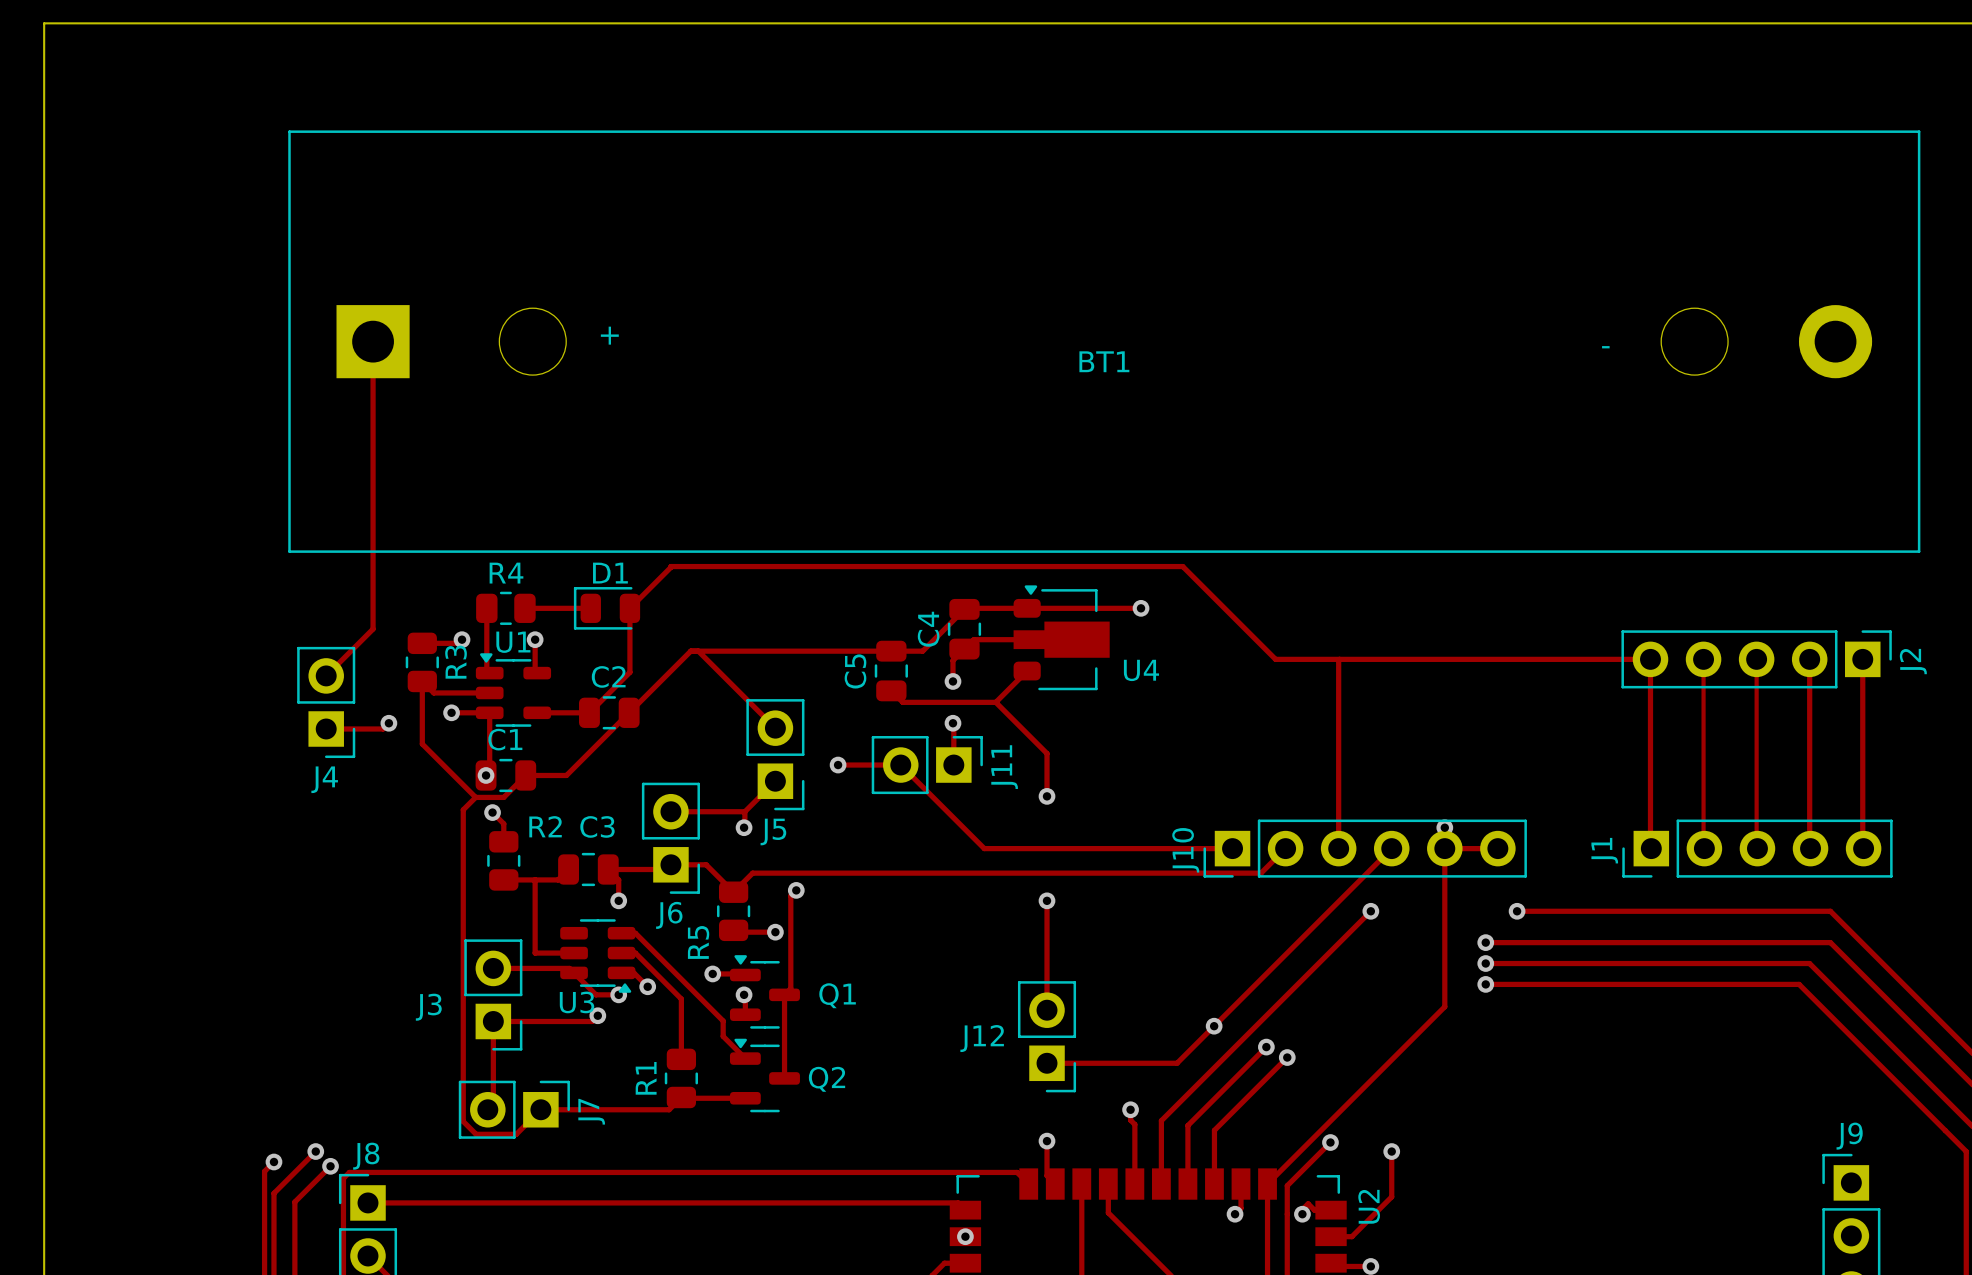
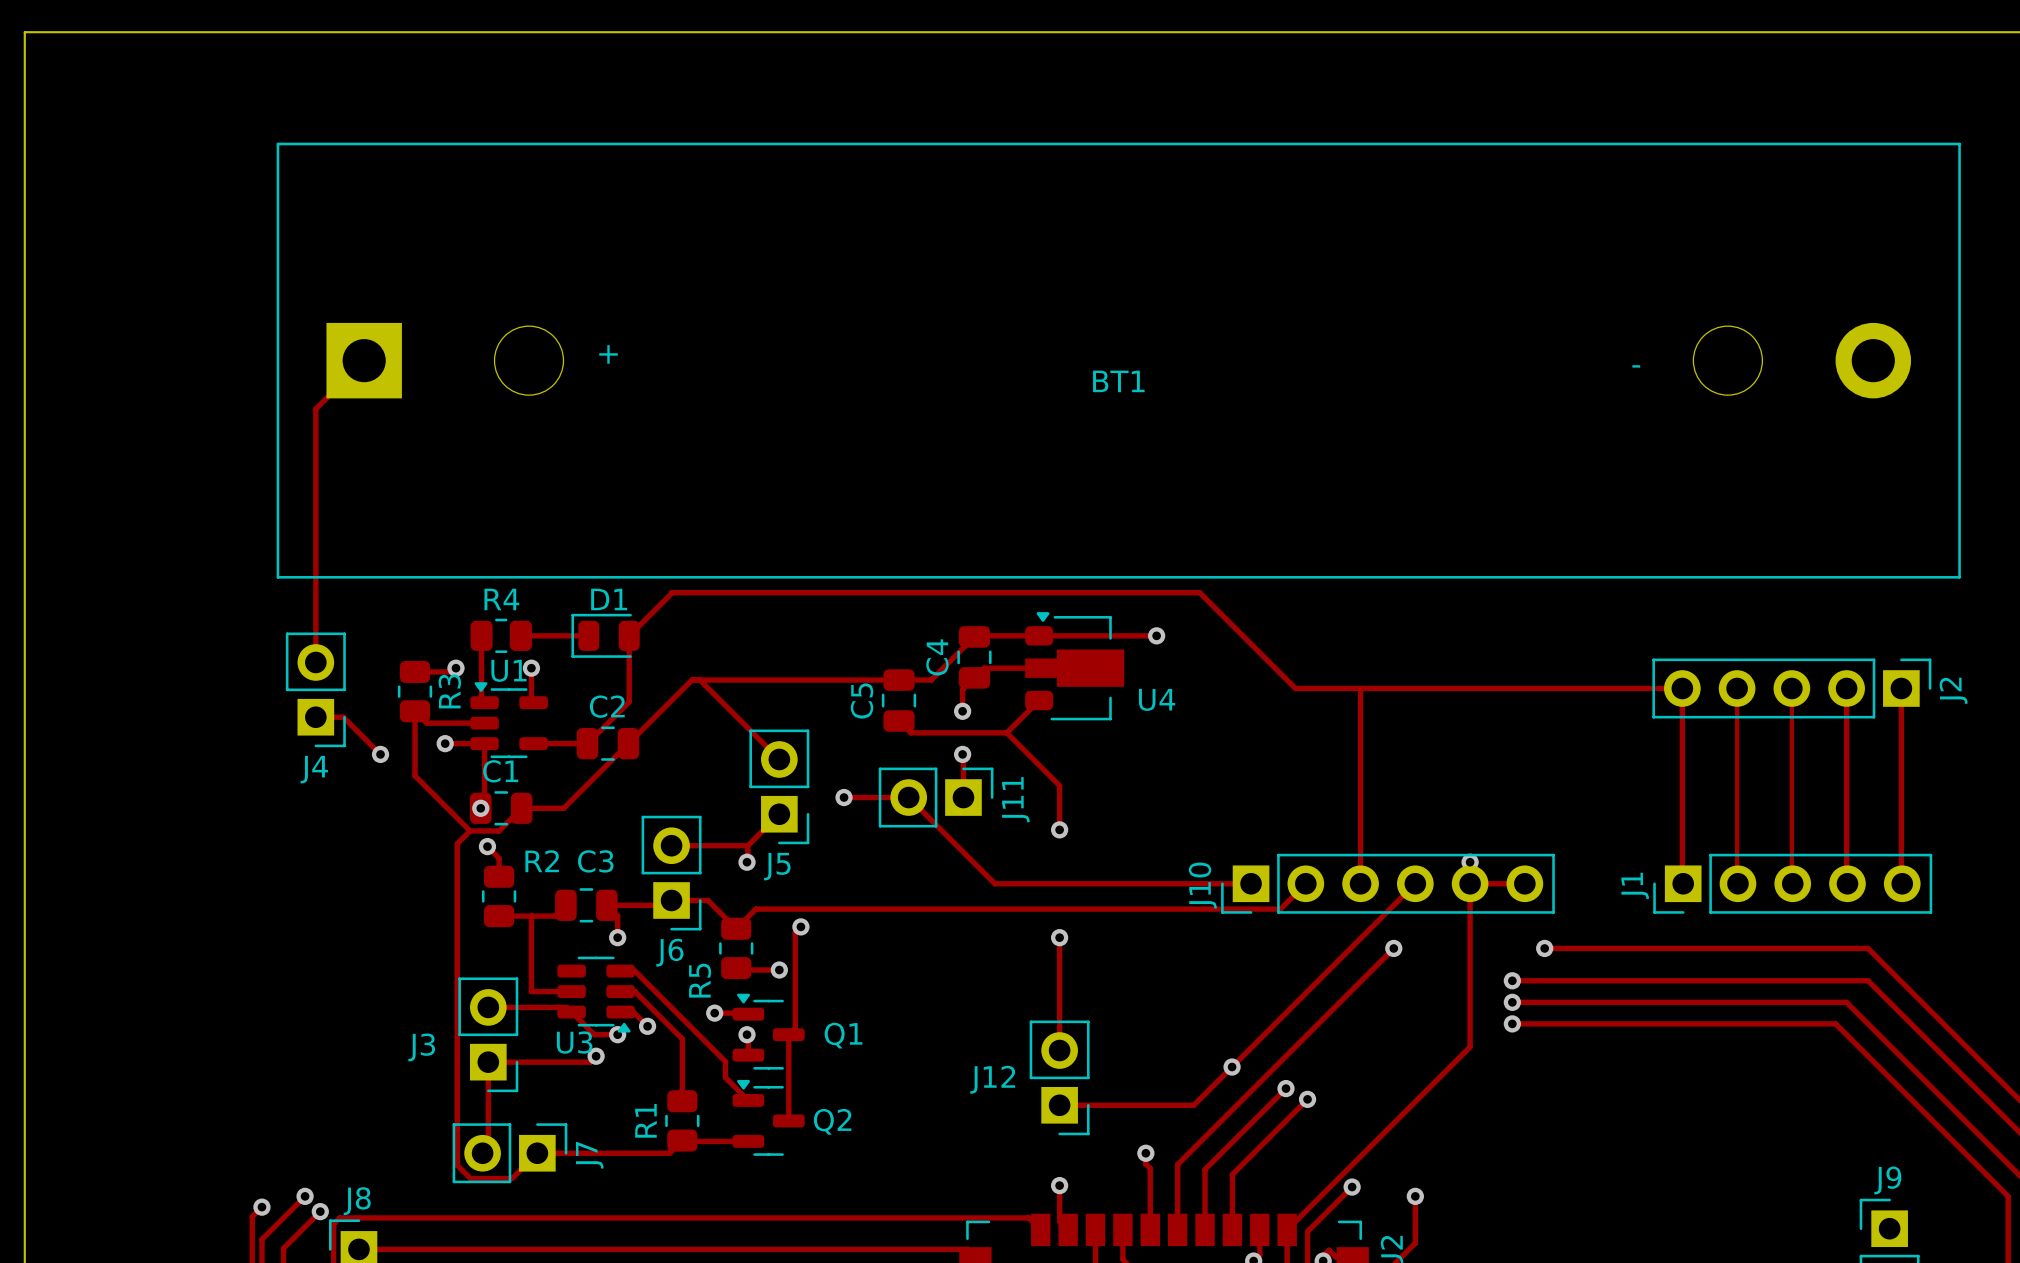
track: (373, 341) (373, 629) (326, 675) -> (364, 360) (315, 408) (315, 662)
J4 position: (326, 702) -> (315, 689)
track: (388, 723) (383, 728) (326, 728) -> (380, 754) (343, 717) (315, 717)

